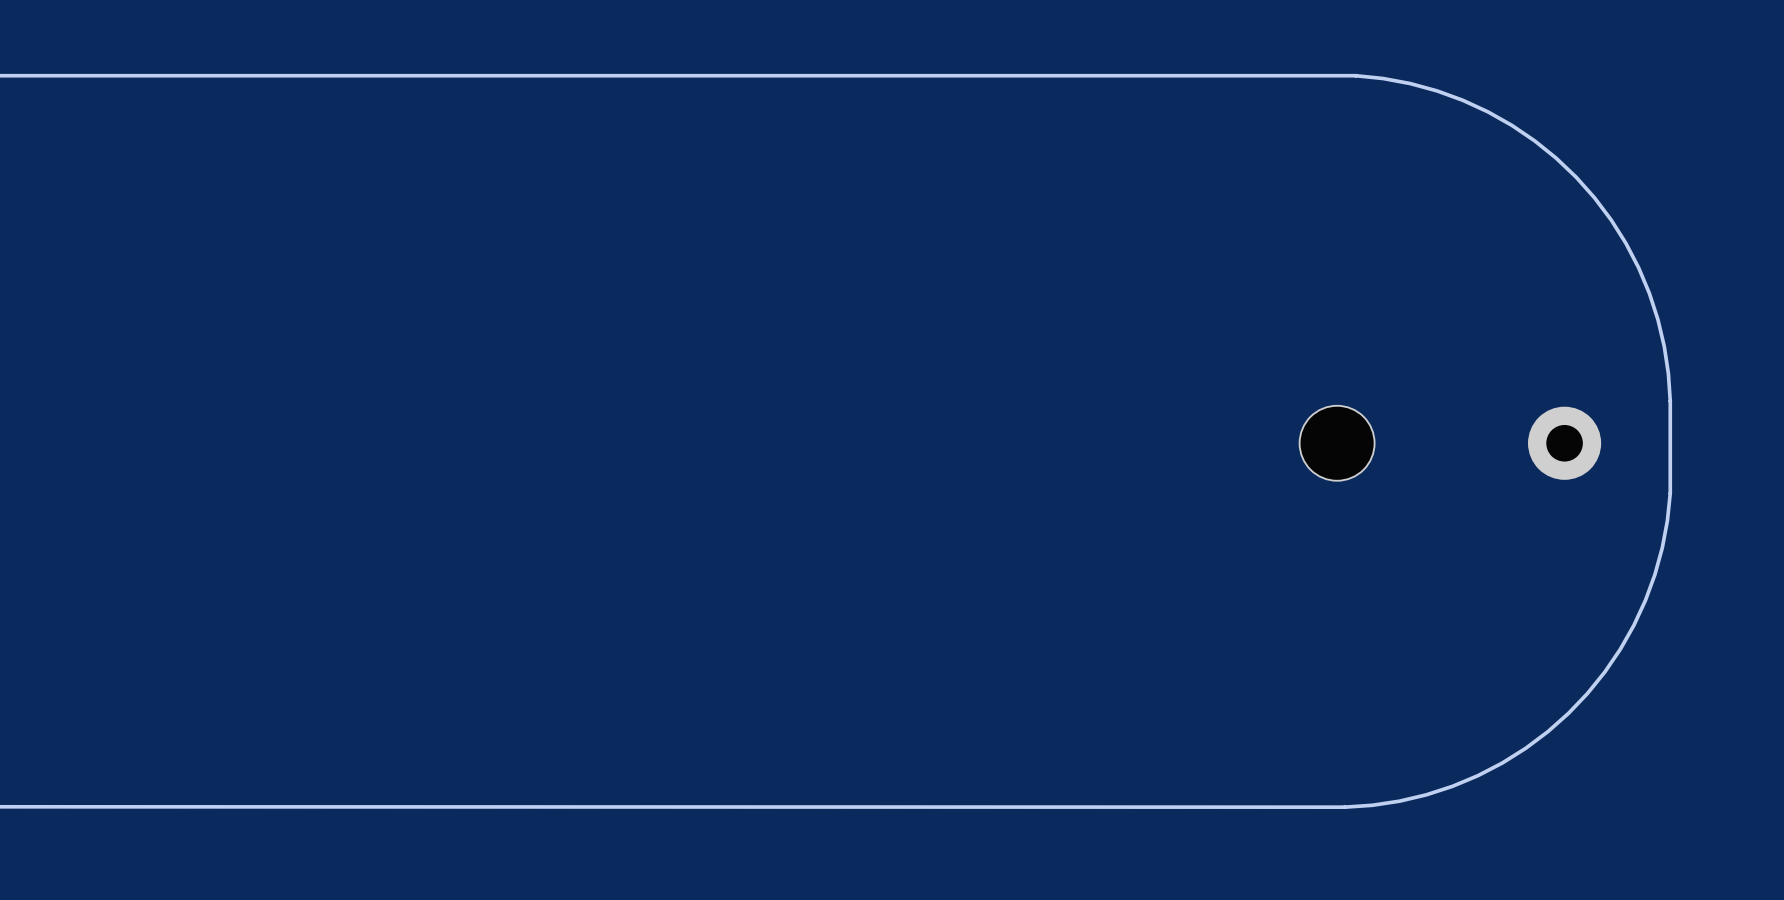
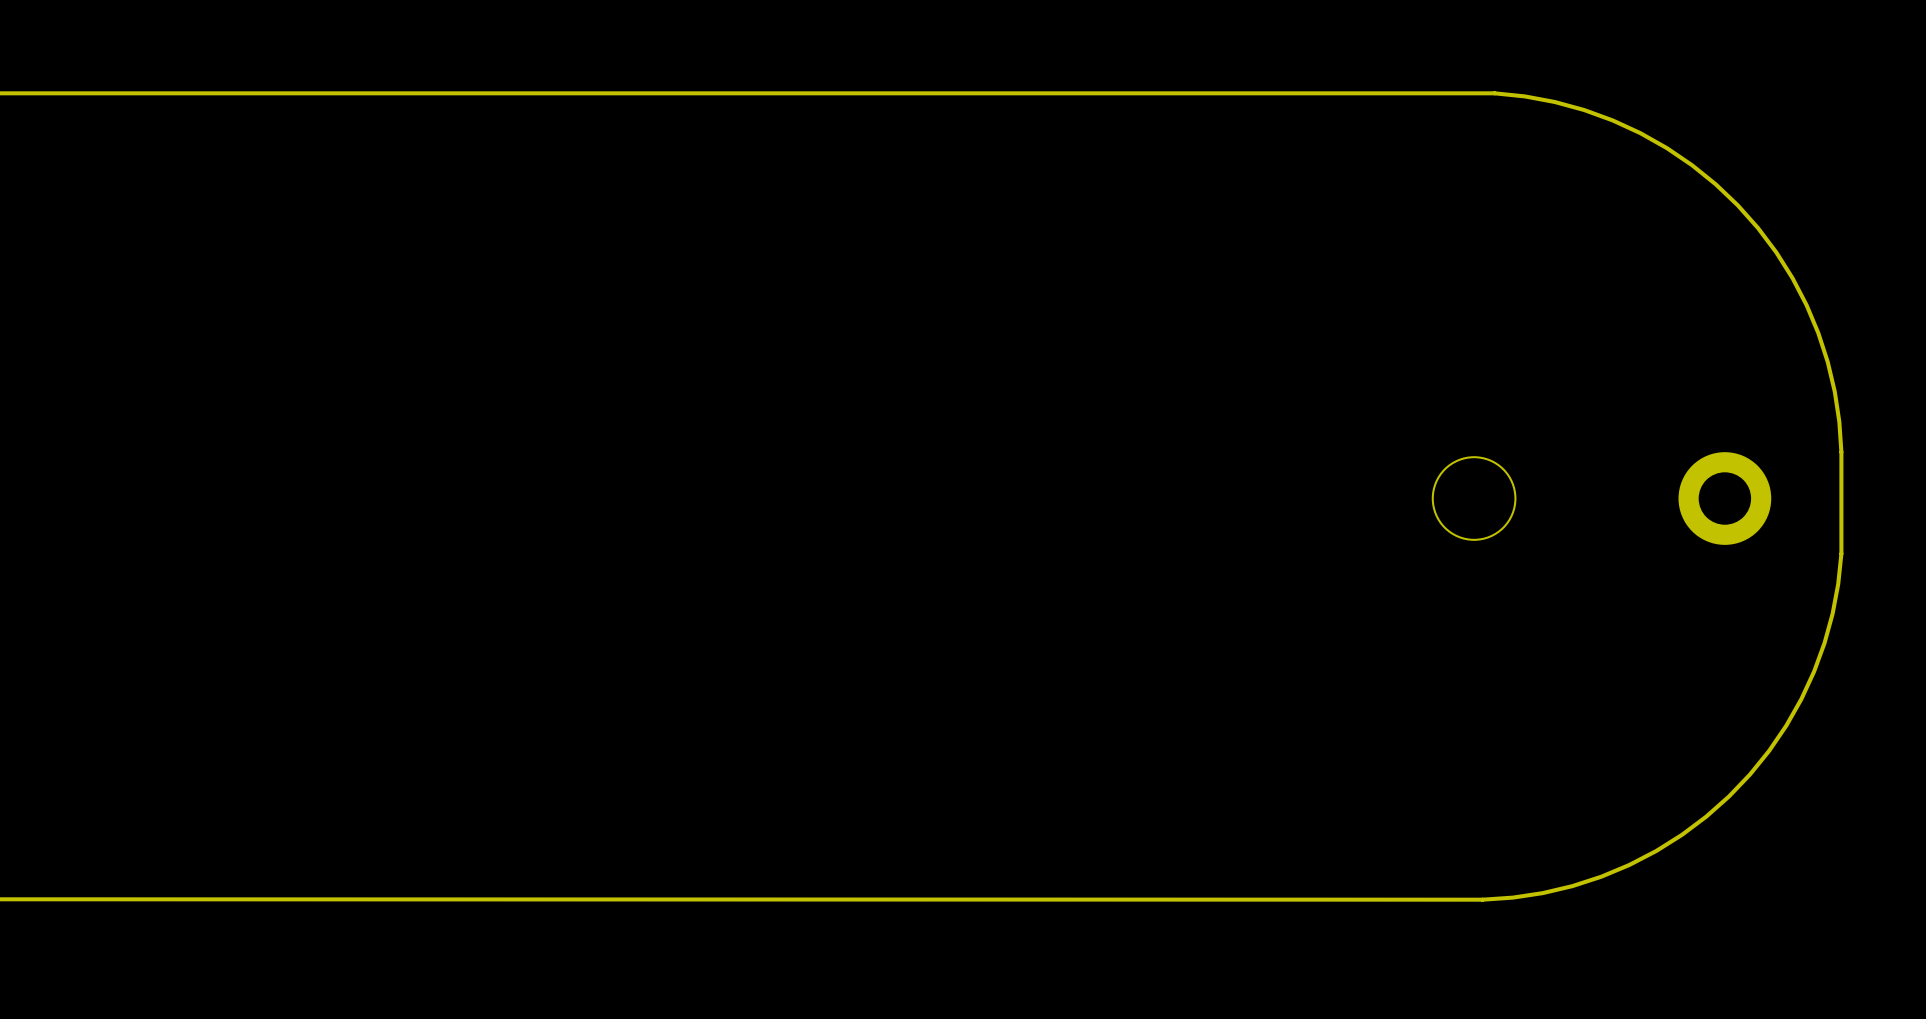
part footprint: [1528, 406, 1602, 480] -> [1678, 452, 1772, 545]

